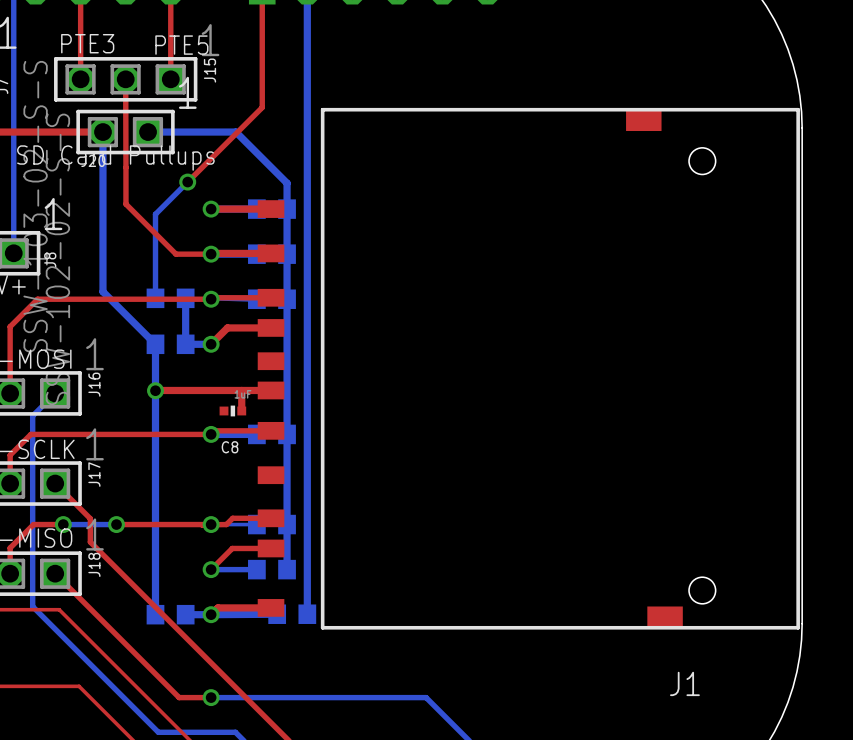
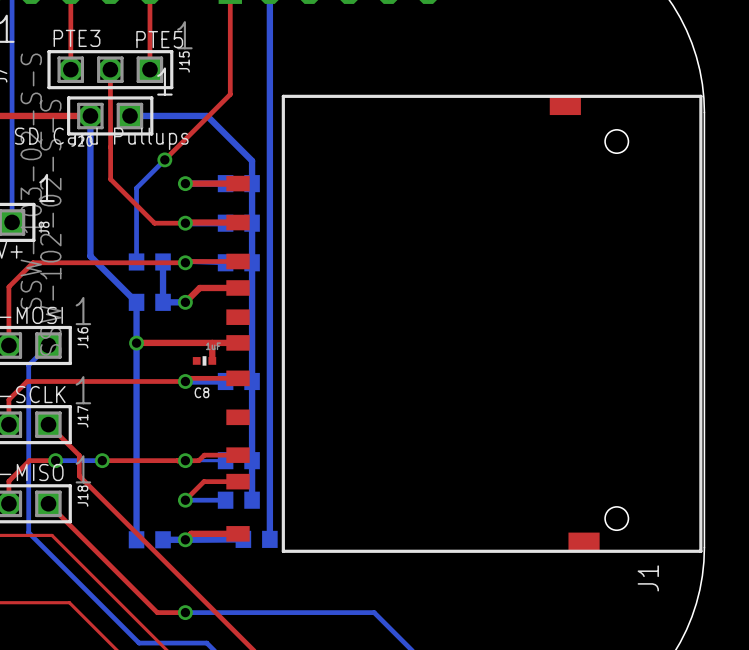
J1 name rotation: 0° (684, 683) -> 90° counterclockwise (648, 578)
J1 name position: J1 (684, 683) -> J1 (648, 578)

